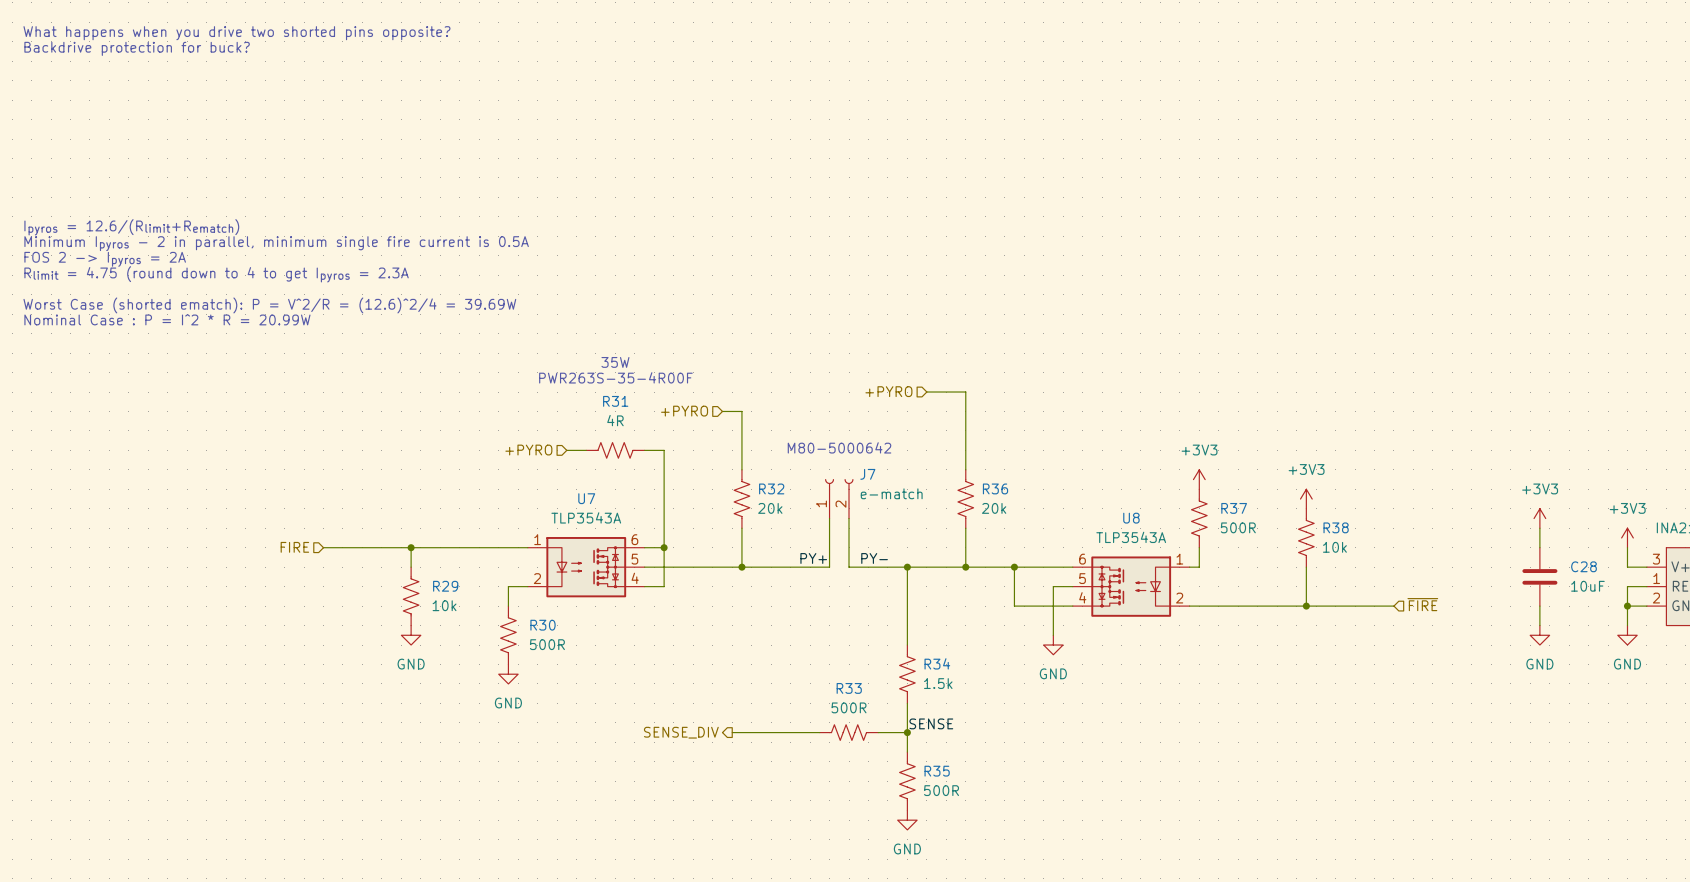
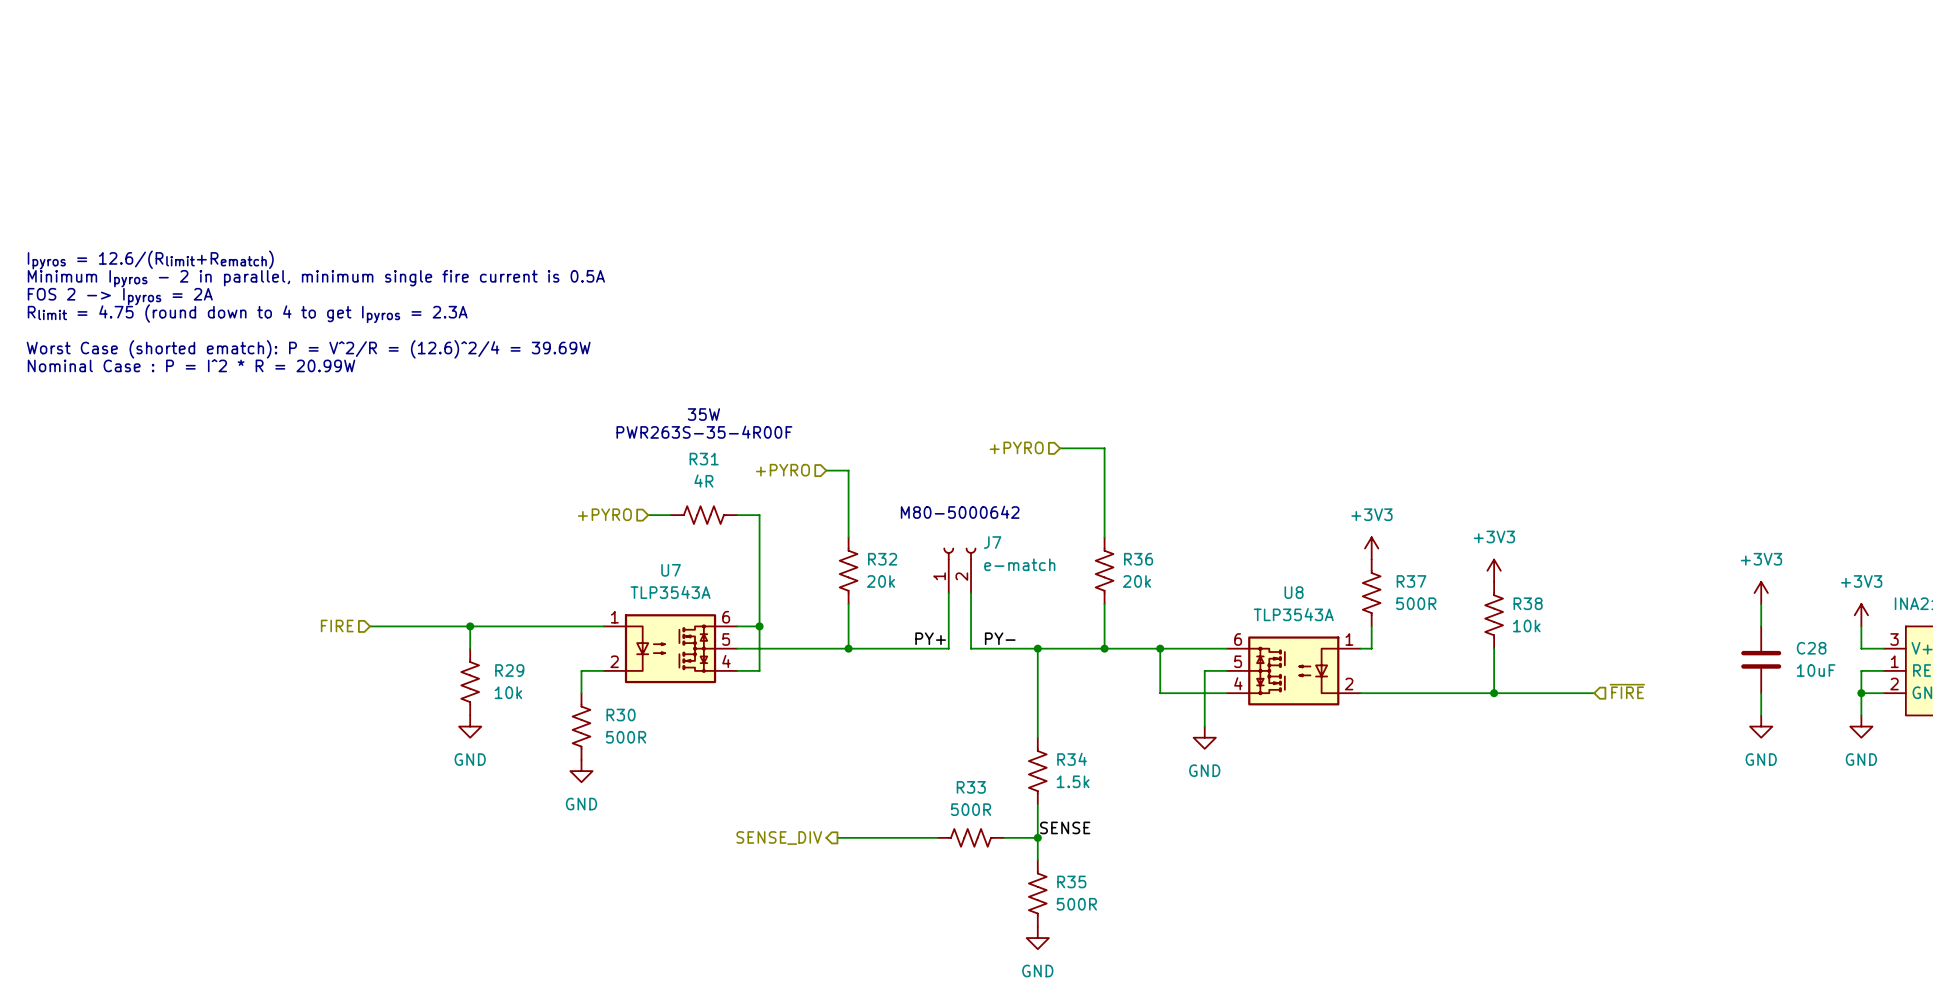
text: What happens when you drive two shorted pins opposite? (236, 33) -> none
text: Backdrive protection for buck? (137, 48) -> none

